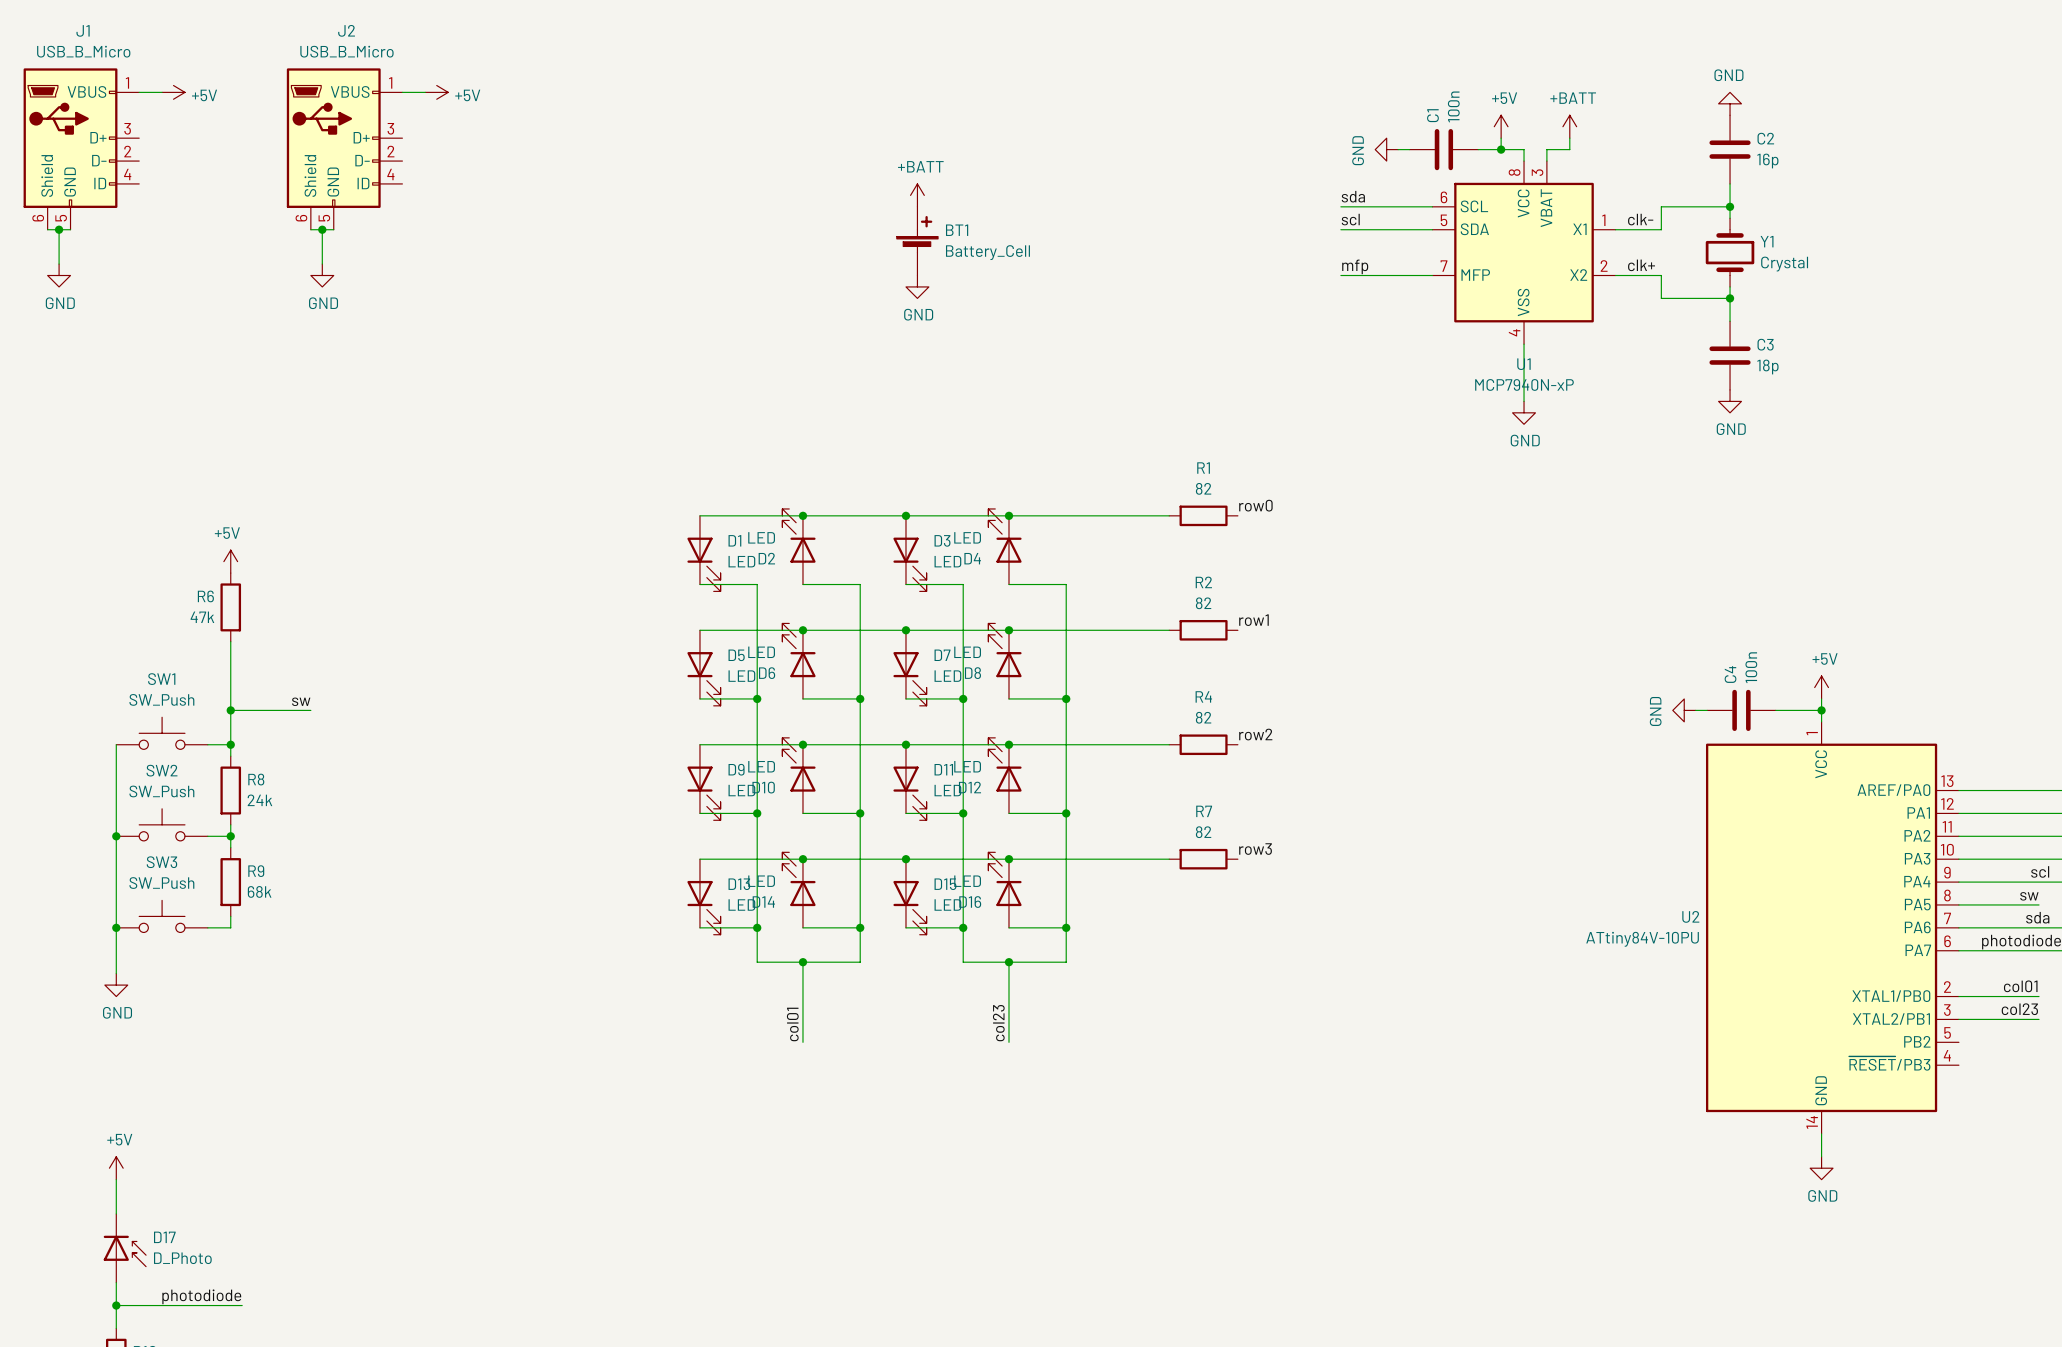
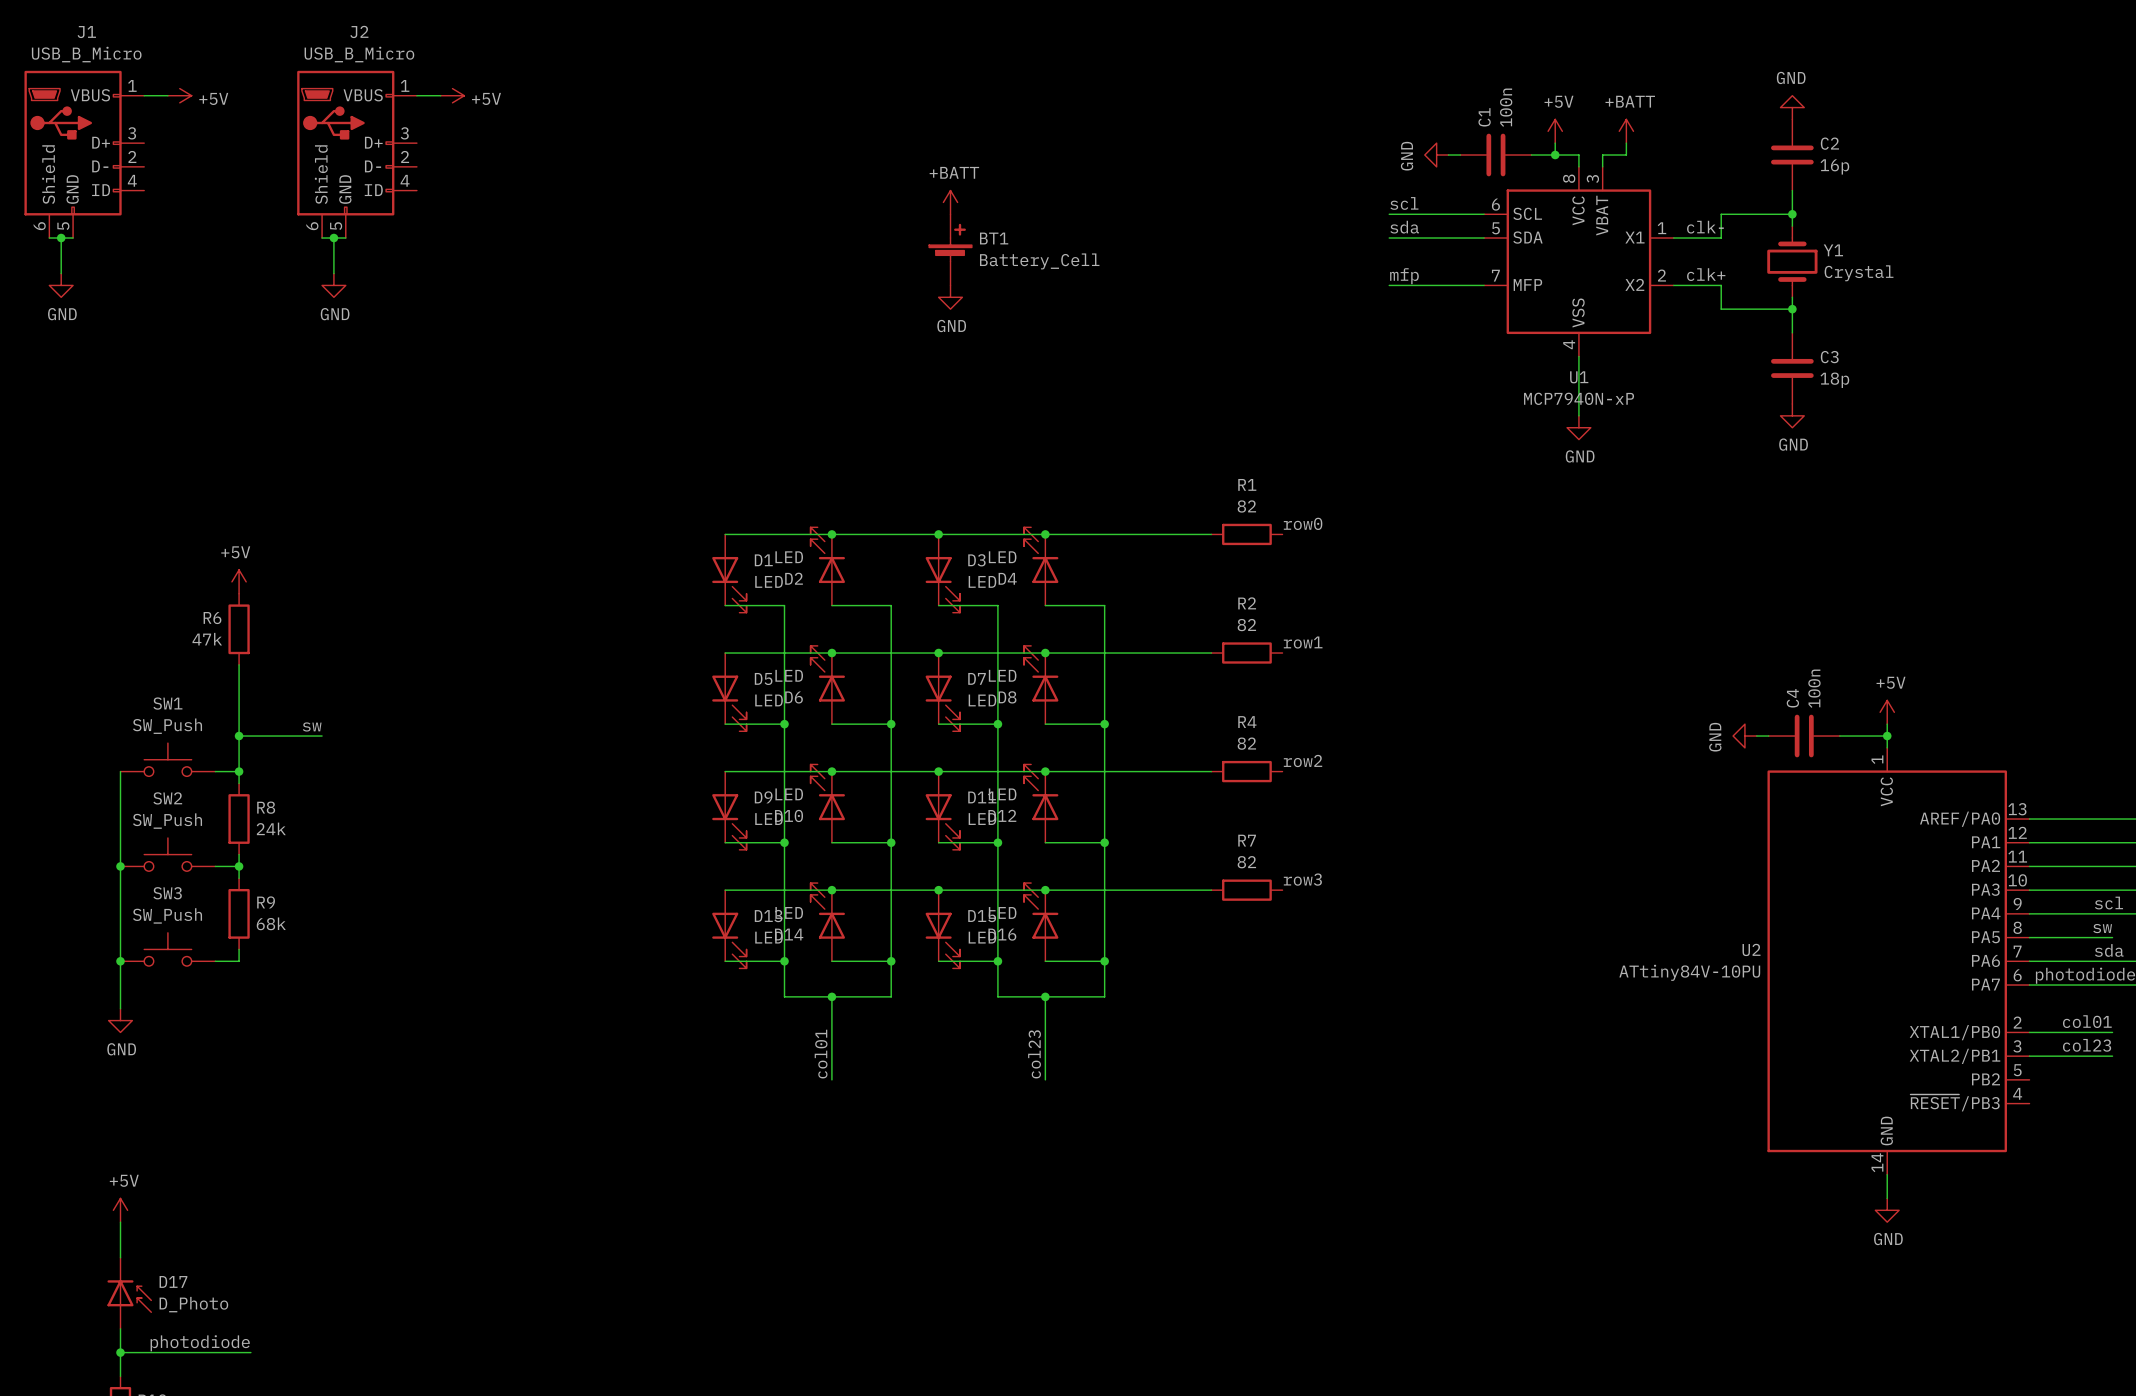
label: sda (1353, 196) -> scl (1404, 203)
label: scl (1350, 219) -> sda (1404, 227)

